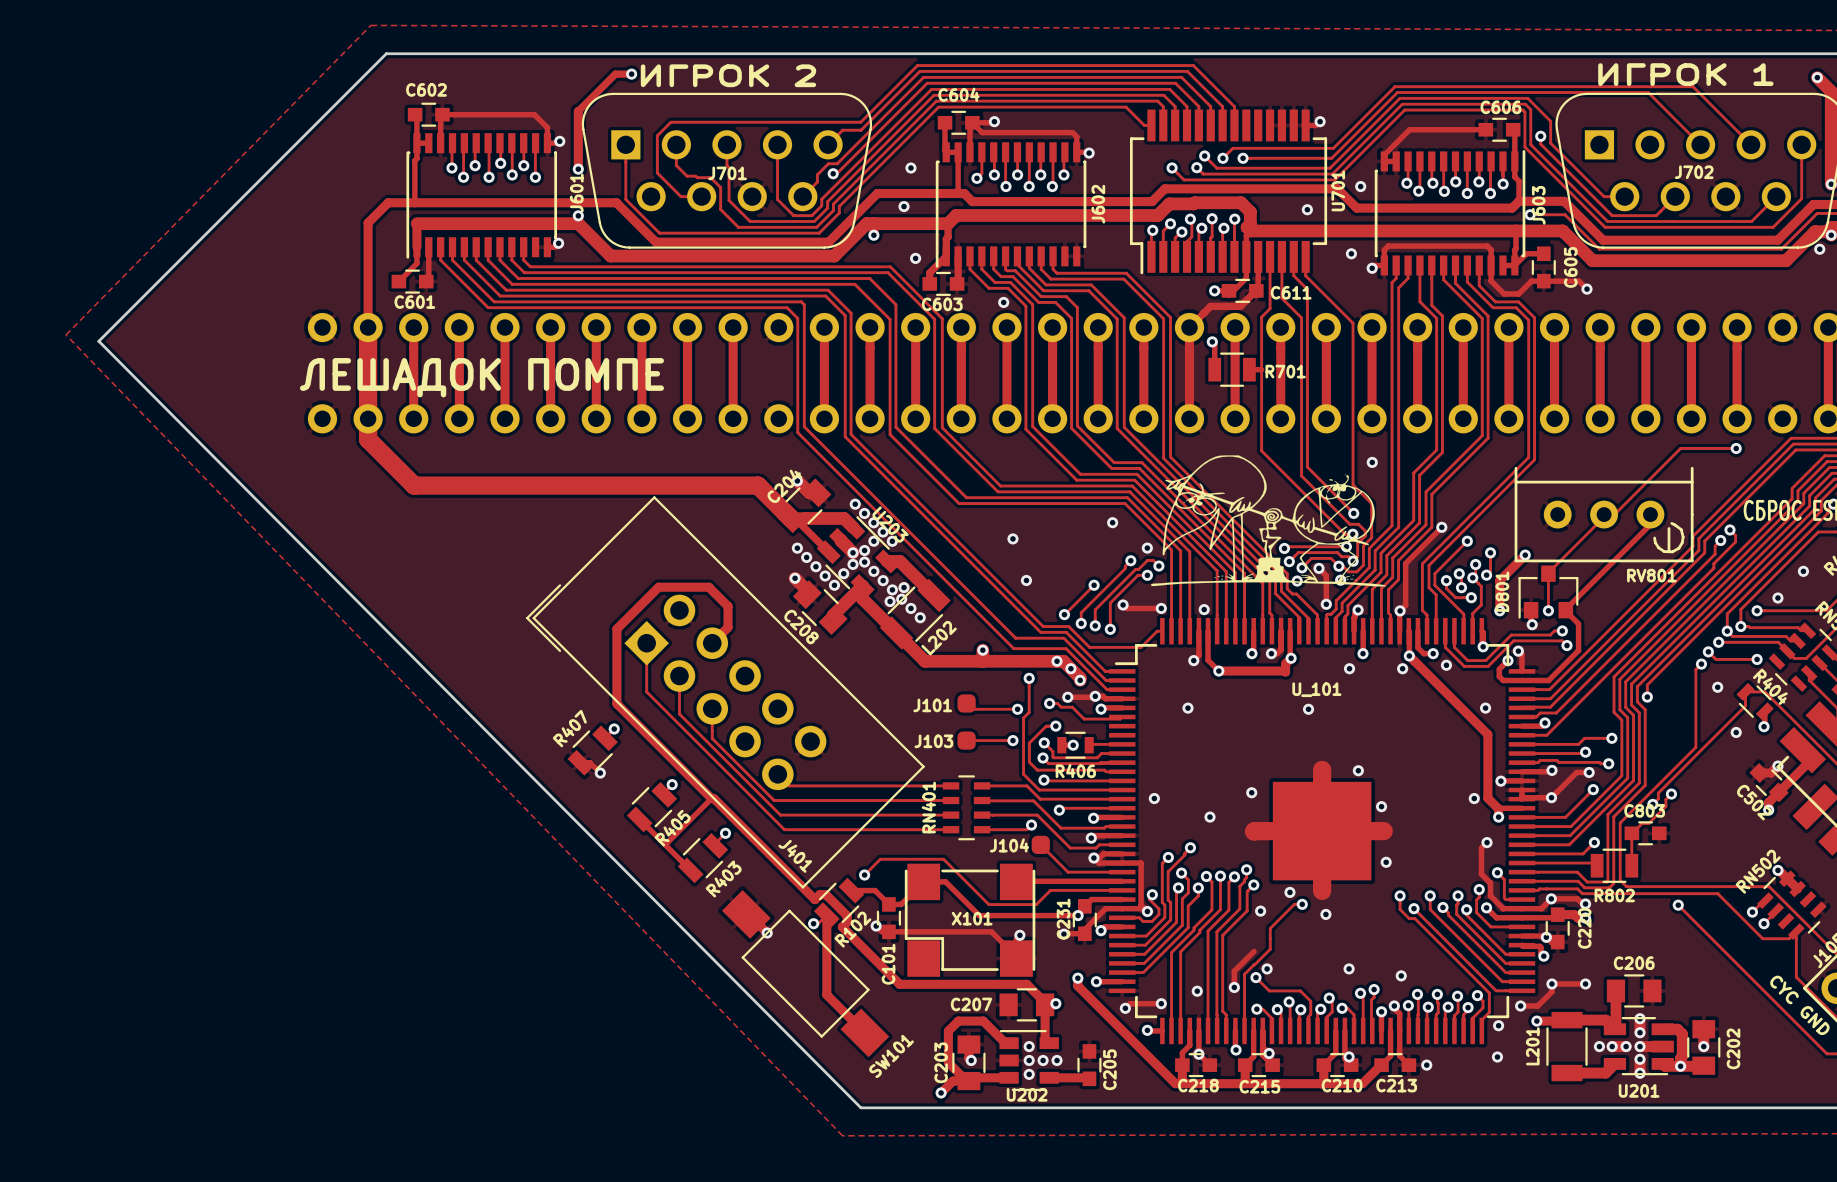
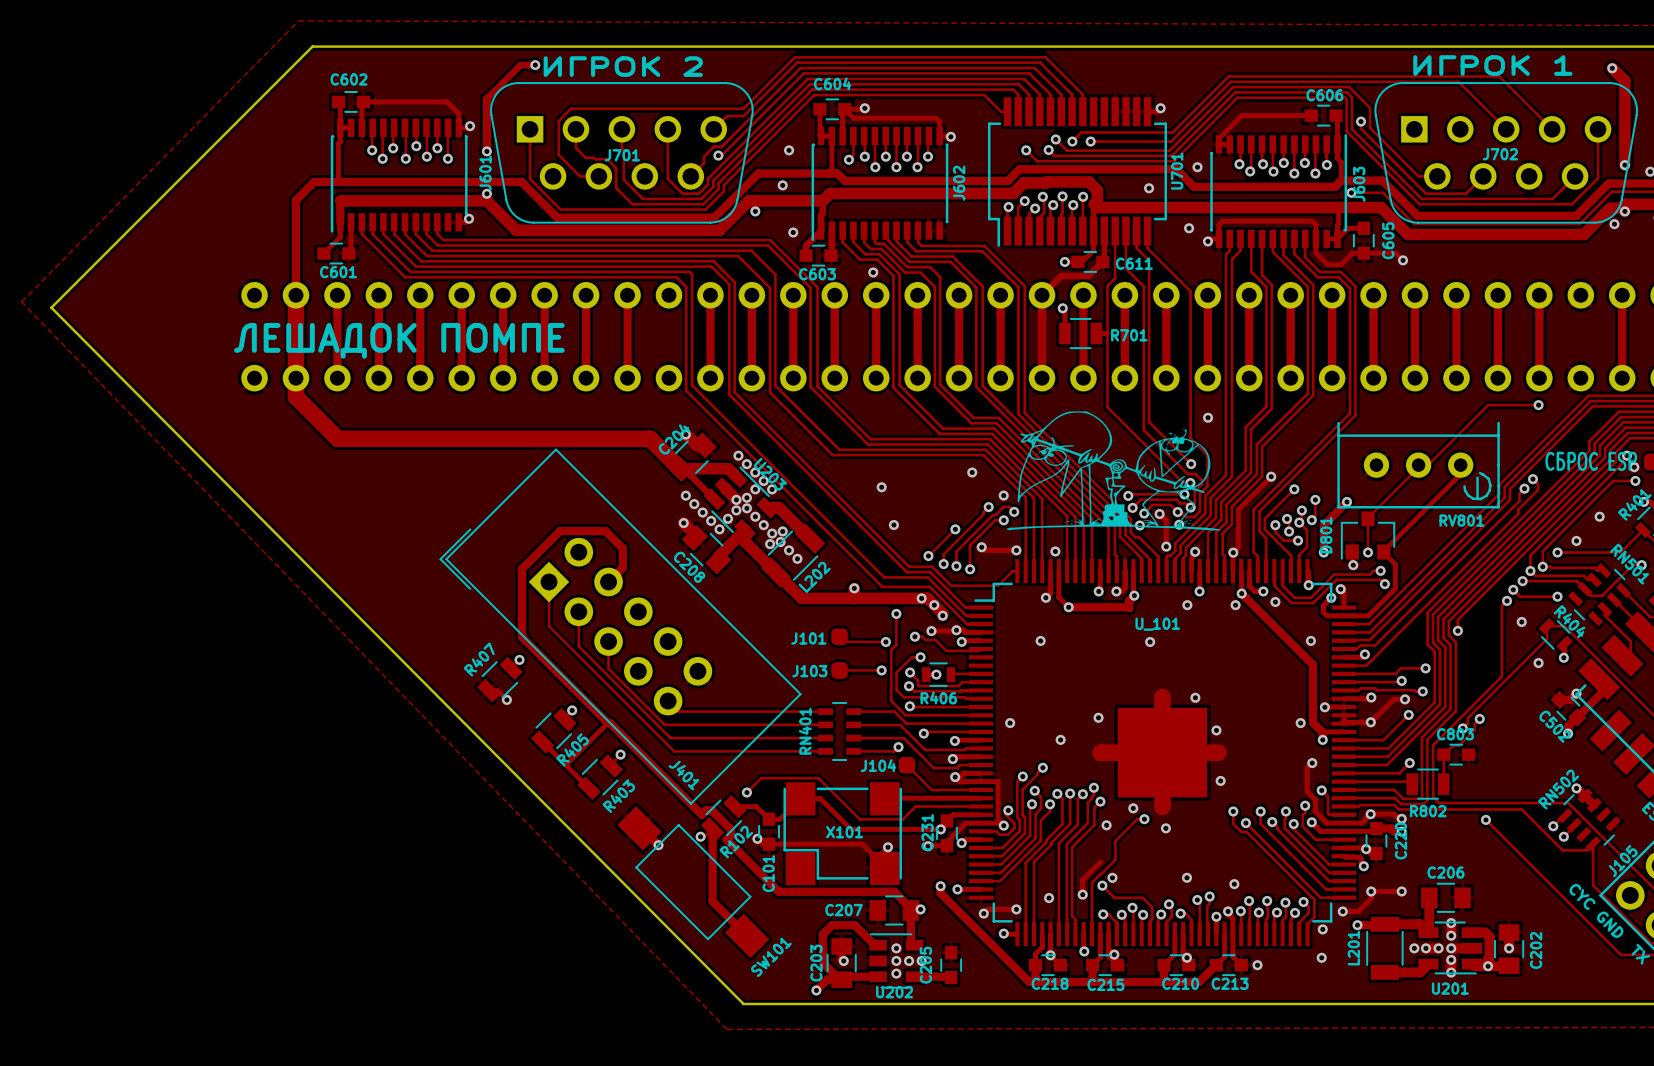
C205 name position: C205 (1109, 1069) -> C205 (925, 965)

